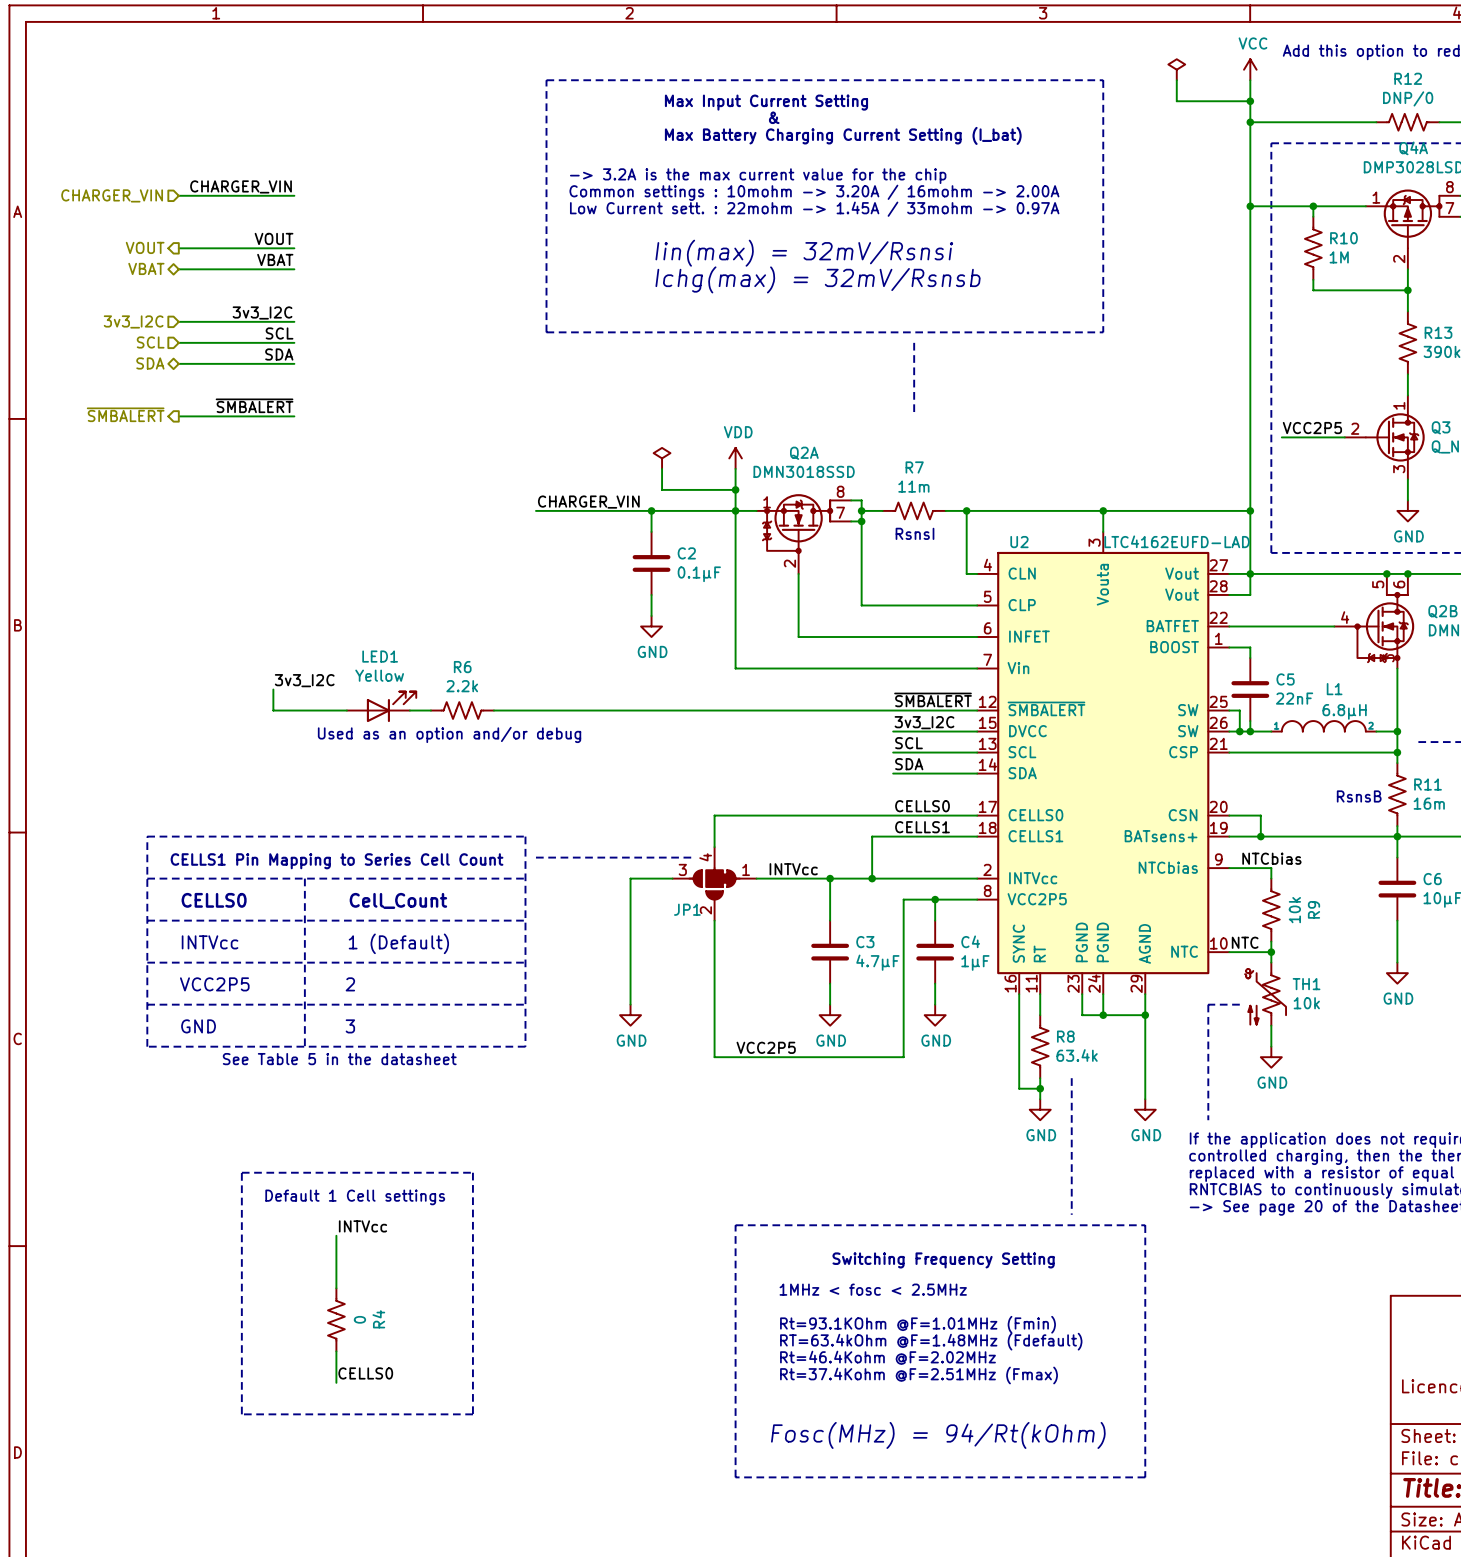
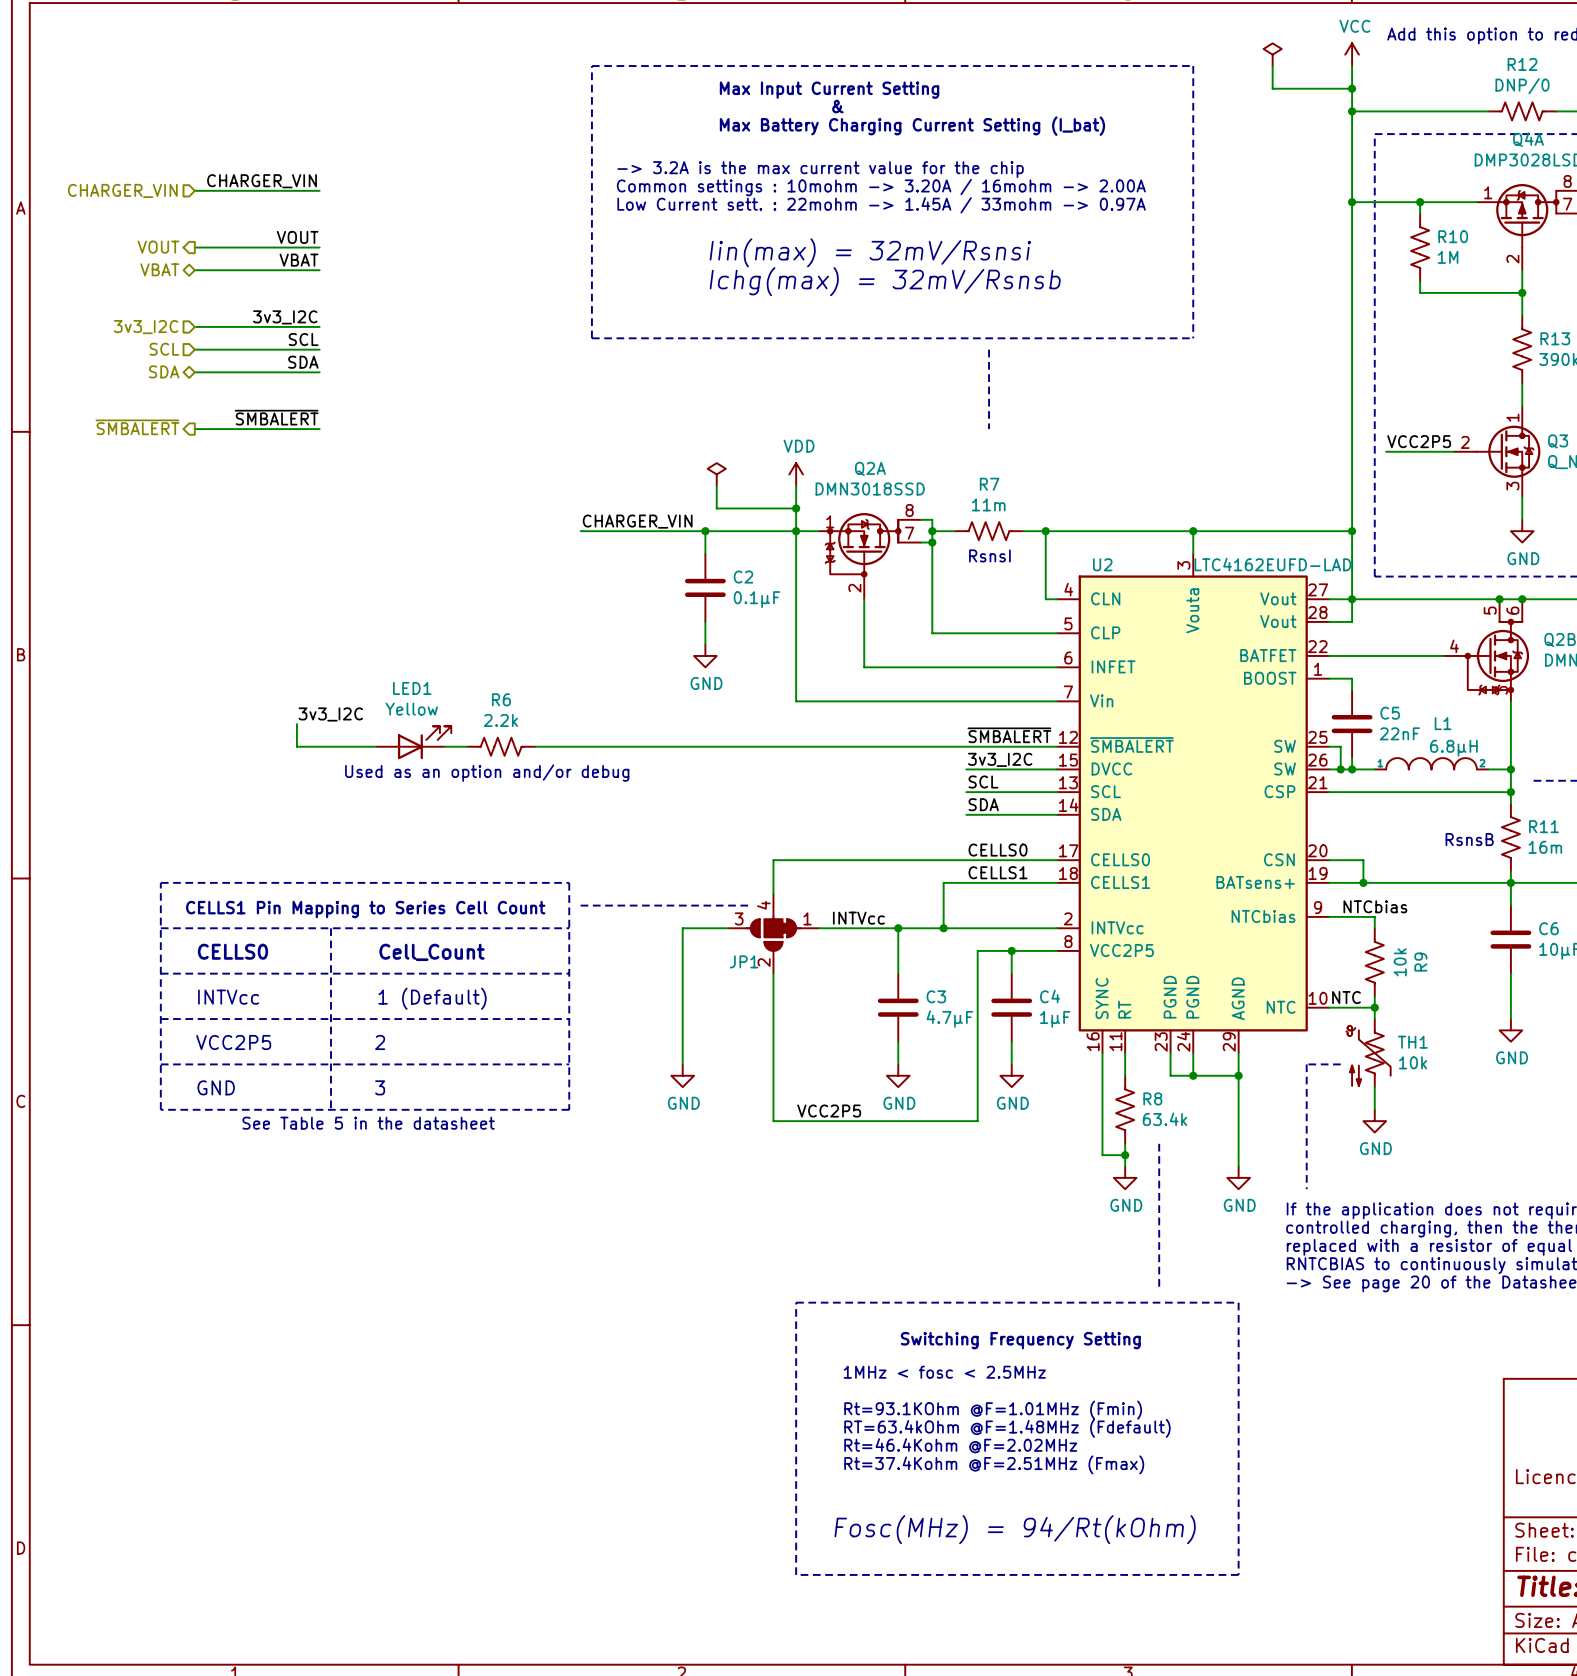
line: (241, 1172) (472, 1172) (472, 1414) (241, 1414) (241, 1172) -> none
text: Default 1 Cell settings (355, 1197) -> none
label: INTVcc (362, 1226) -> none
wire: (336, 1235) (336, 1288) -> none
R4: 0 (336, 1319) -> none
wire: (336, 1351) (336, 1382) -> none
label: CELLS0 (365, 1373) -> none

